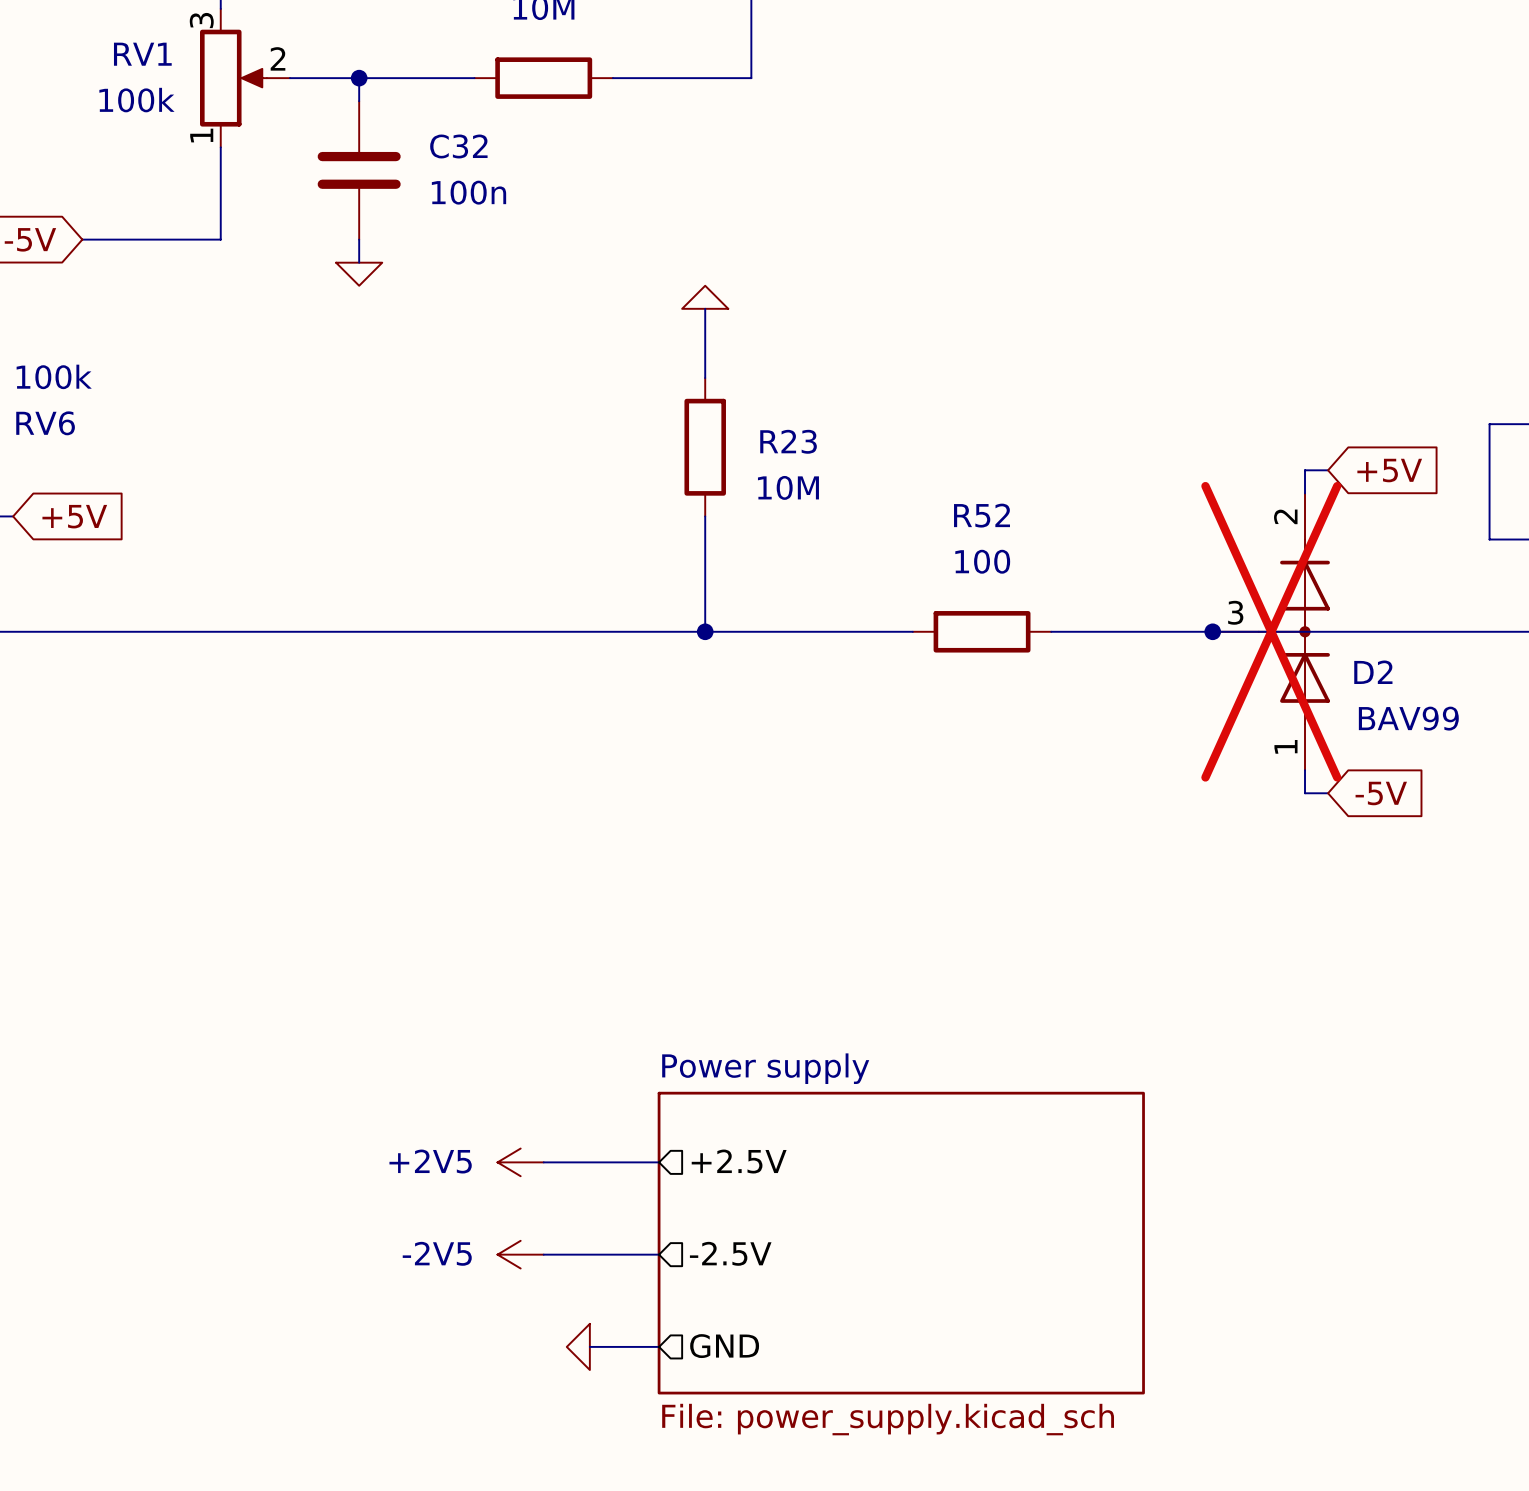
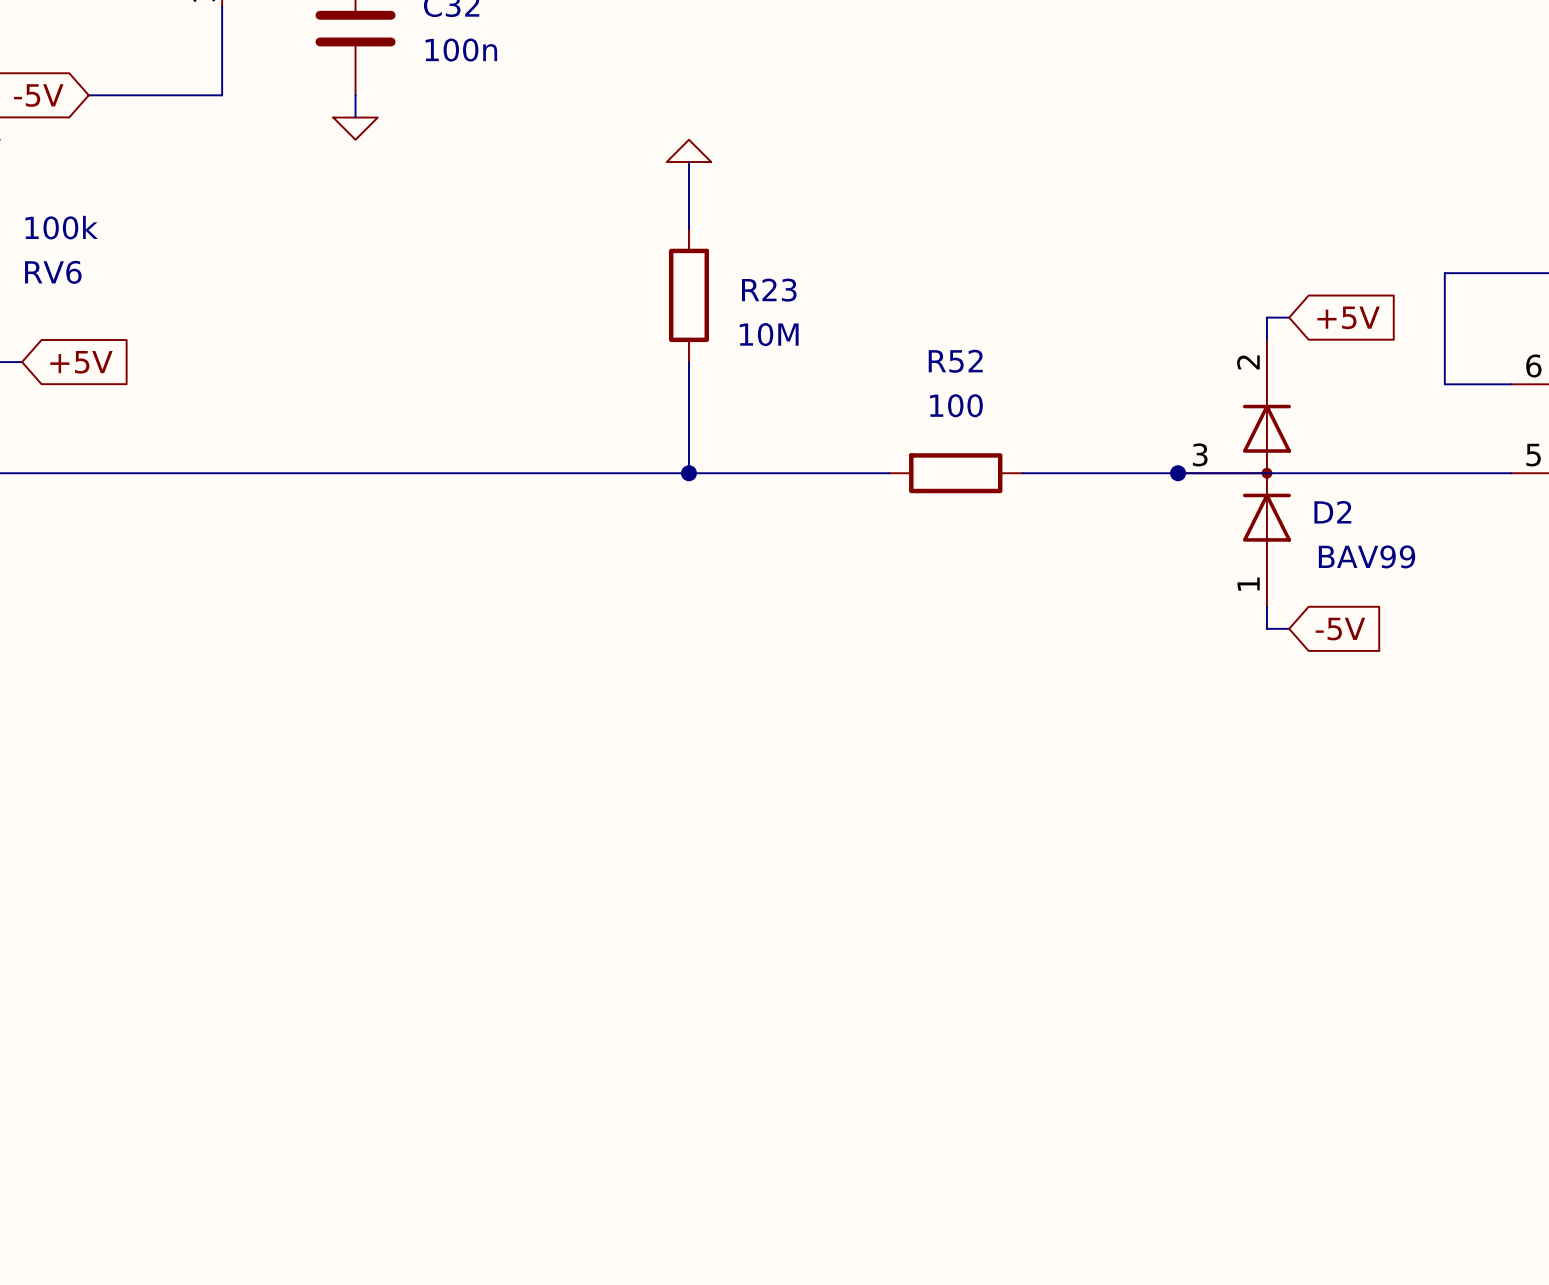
D2 do-not-place cross: (1271, 631) -> none
sheet pin: +2.5V (739, 1161) -> none
power symbol: +2V5 (520, 1162) -> none
wire: (543, 1162) (659, 1162) -> none
sheet Power supply: File: power_supply.kicad_sch (901, 1243) -> none
sheet pin: -2.5V (730, 1253) -> none
power symbol: -2V5 (520, 1254) -> none
wire: (543, 1254) (659, 1254) -> none
power symbol: (578, 1346) -> none
wire: (589, 1346) (659, 1346) -> none
sheet pin: GND (724, 1346) -> none

